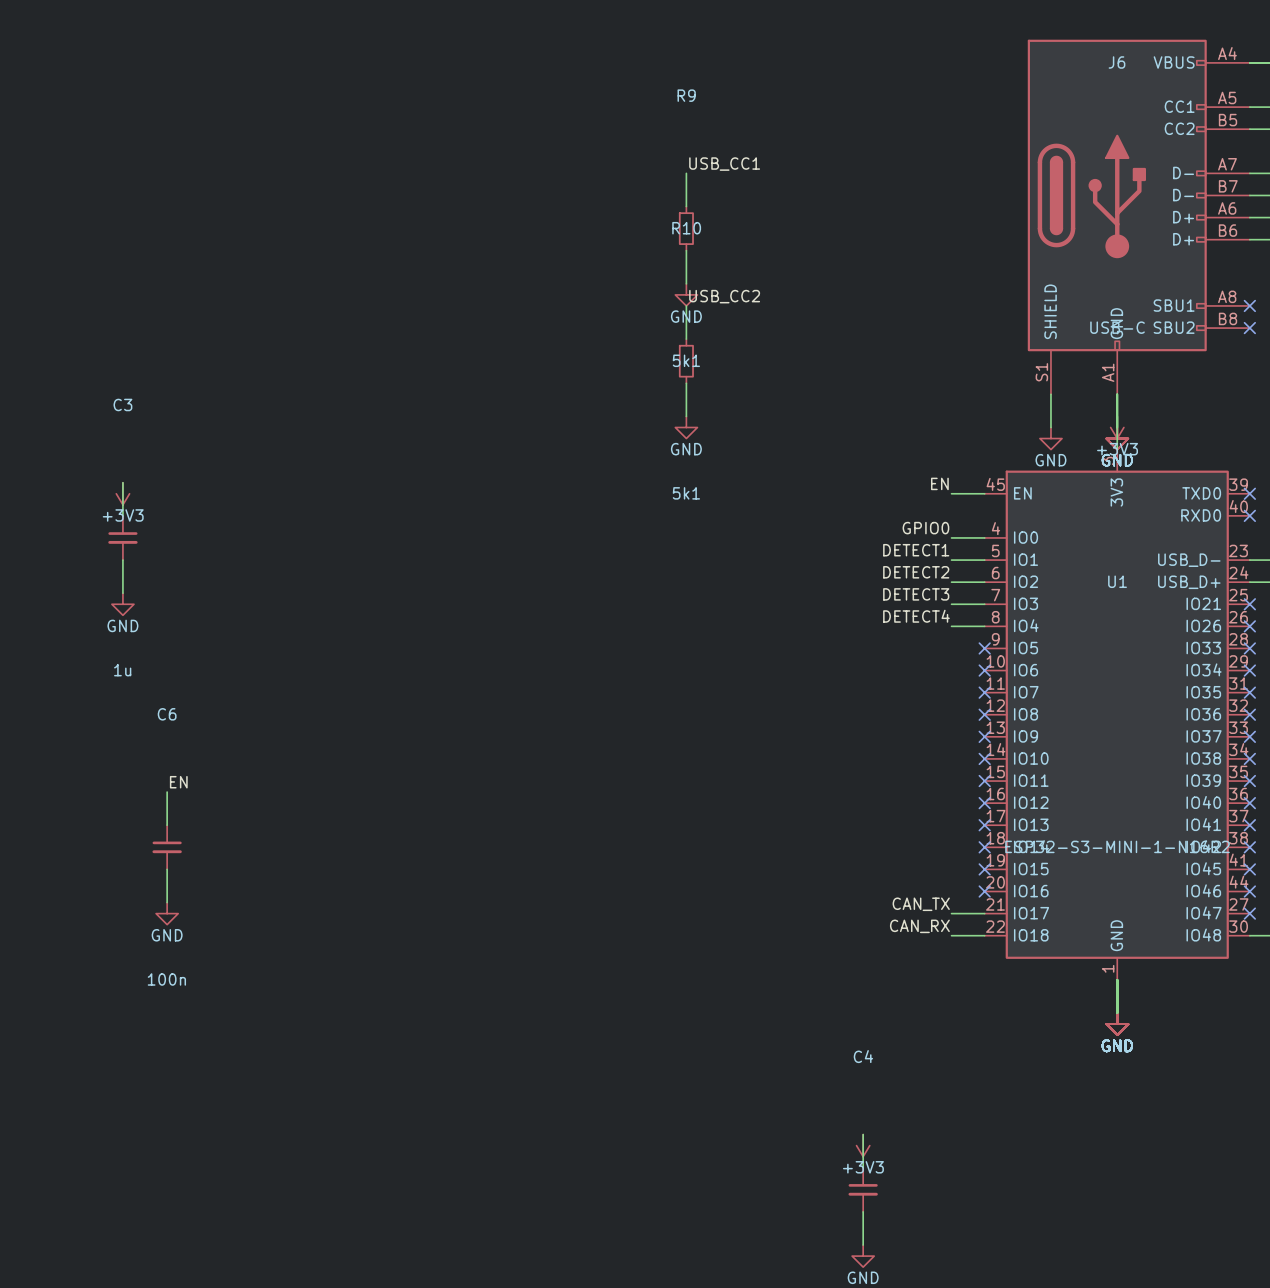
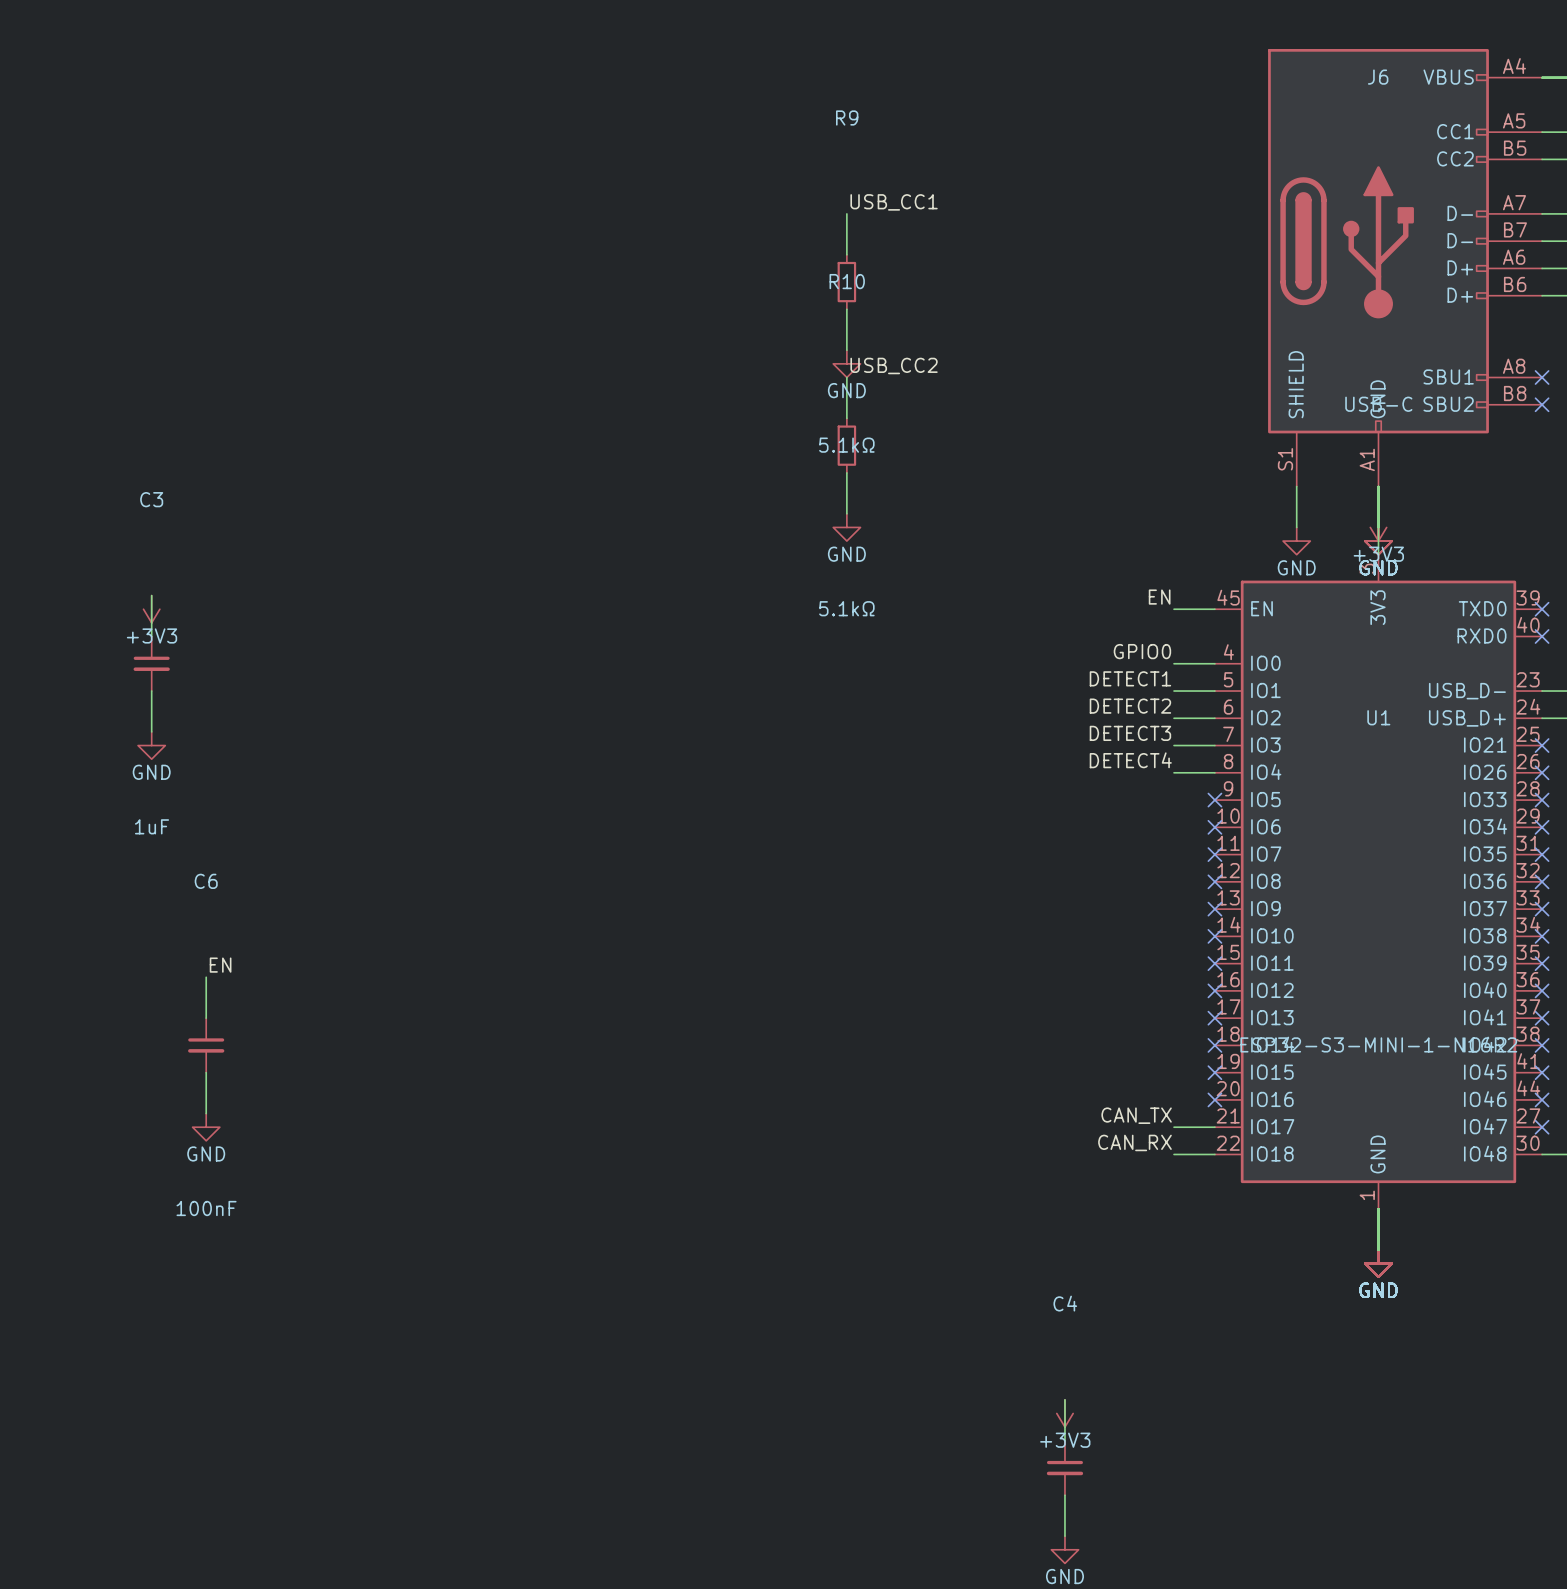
R9 value: 5k1 (686, 360) -> 5.1kΩ (846, 445)
R10 value: 5k1 (686, 493) -> 5.1kΩ (846, 608)
C3 value: 1u (122, 670) -> 1uF (152, 826)
C6 value: 100n (166, 979) -> 100nF (206, 1208)

